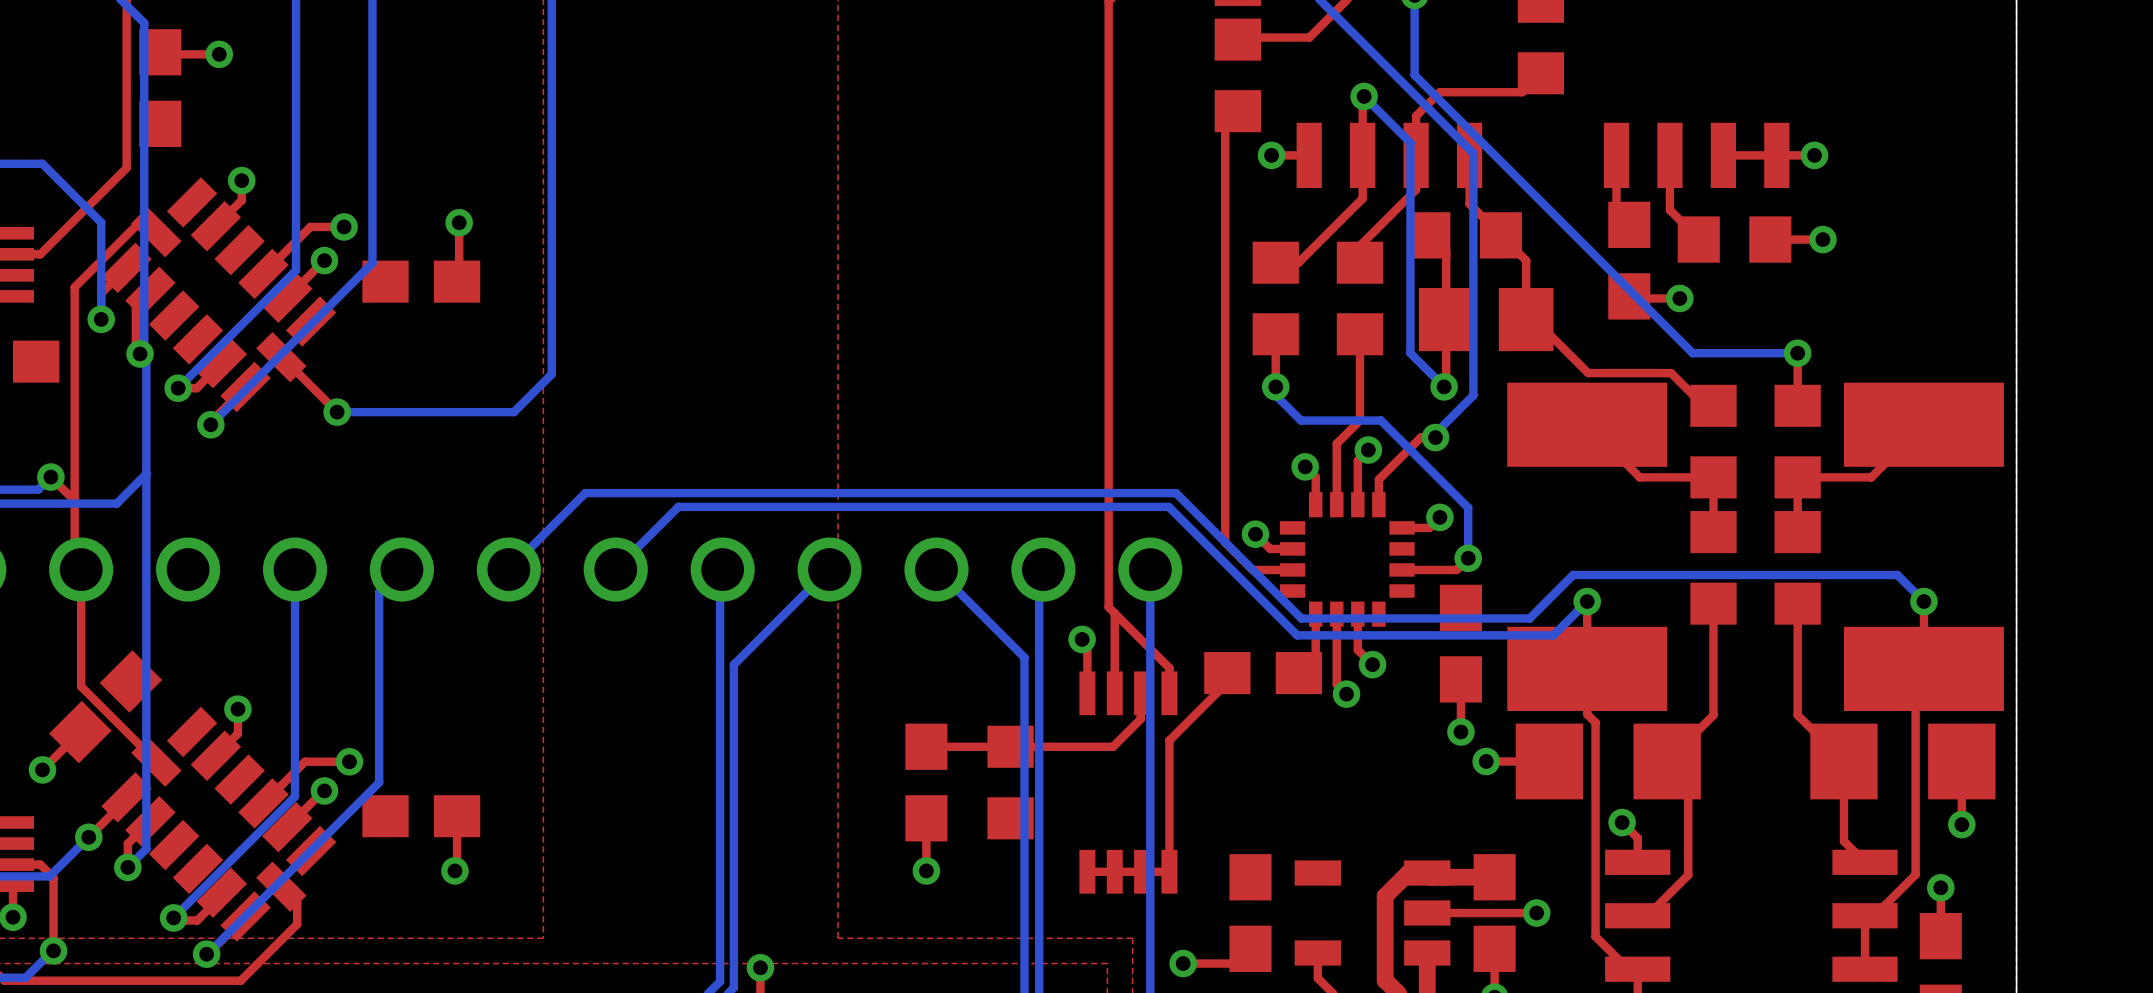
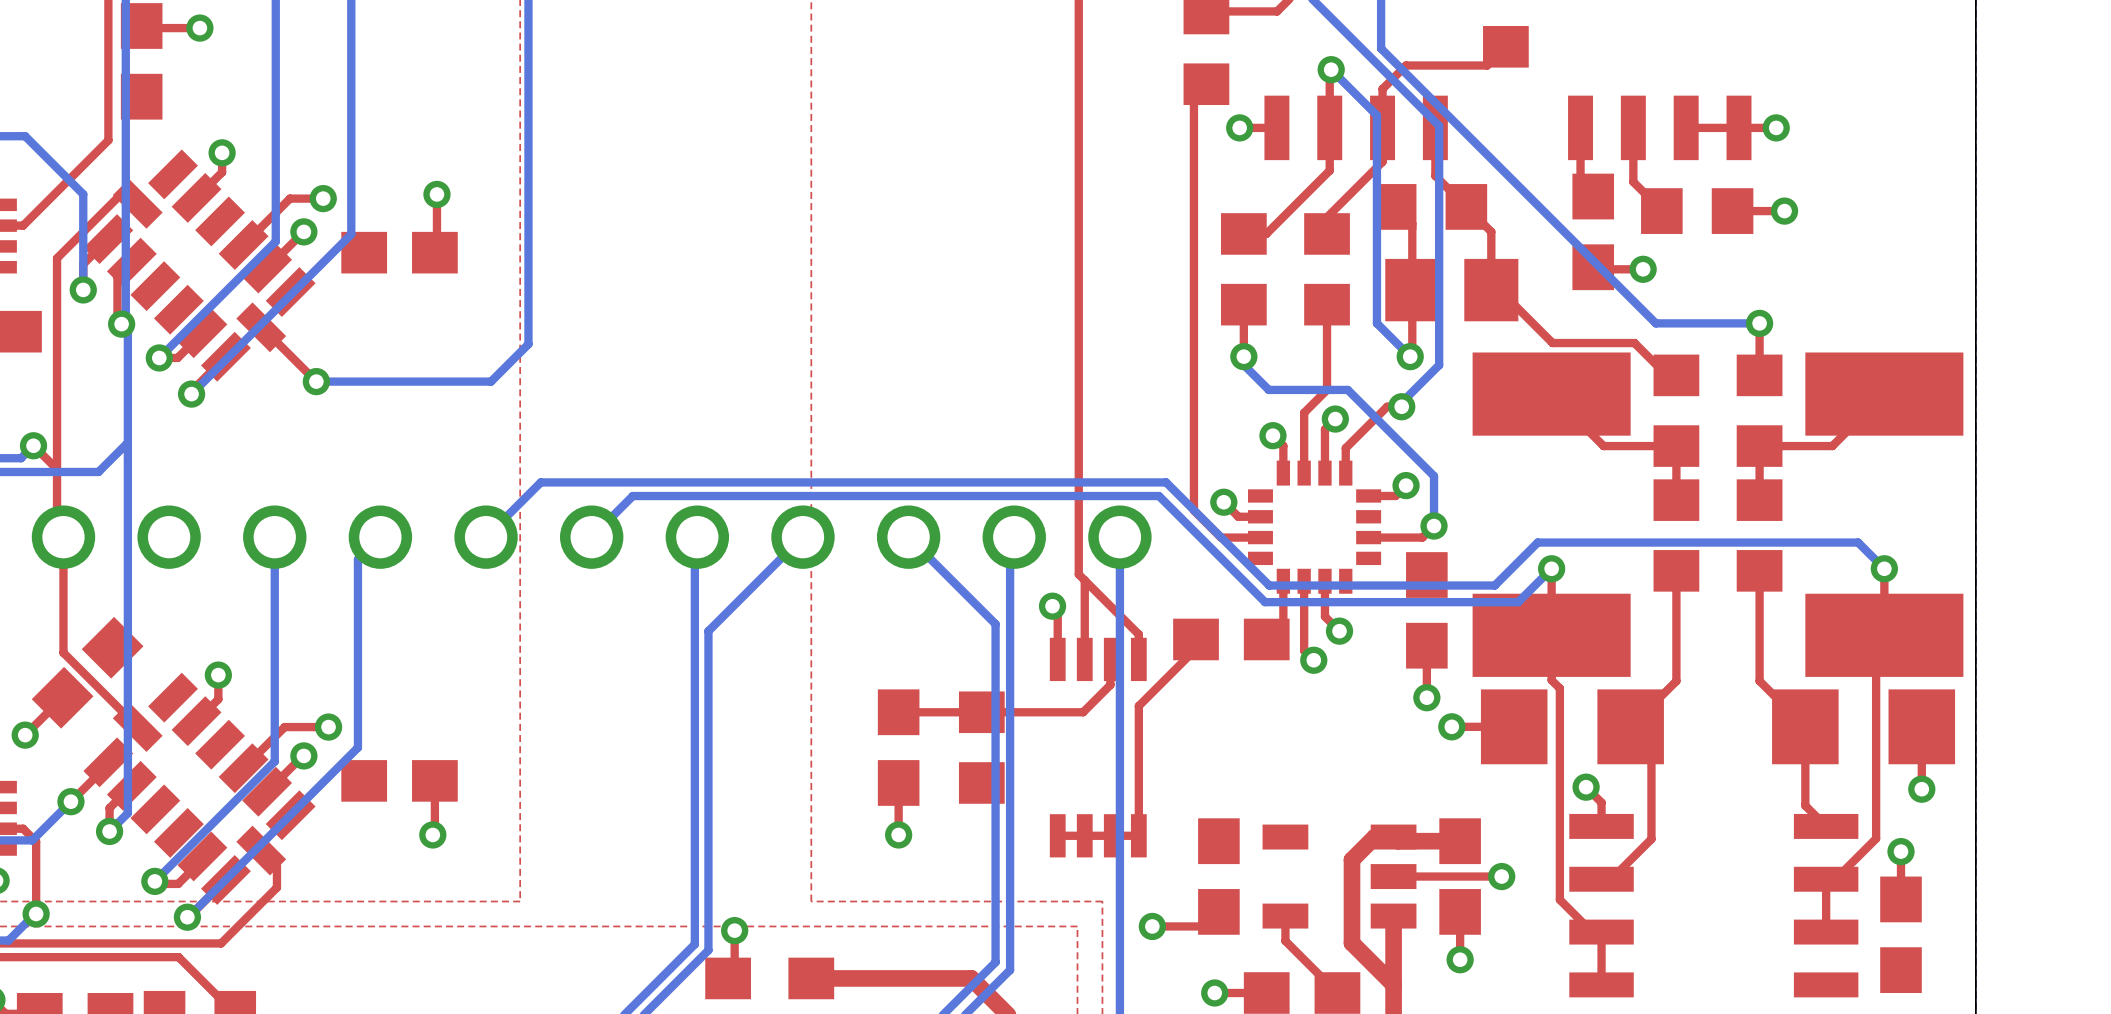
bottom track: (1197, 514) (1176, 493) (585, 493) (564, 514) -> (1166, 482) (540, 482)
bottom track: (1189, 527) (1168, 506) (678, 506) (657, 527) -> (1158, 496) (632, 496)

